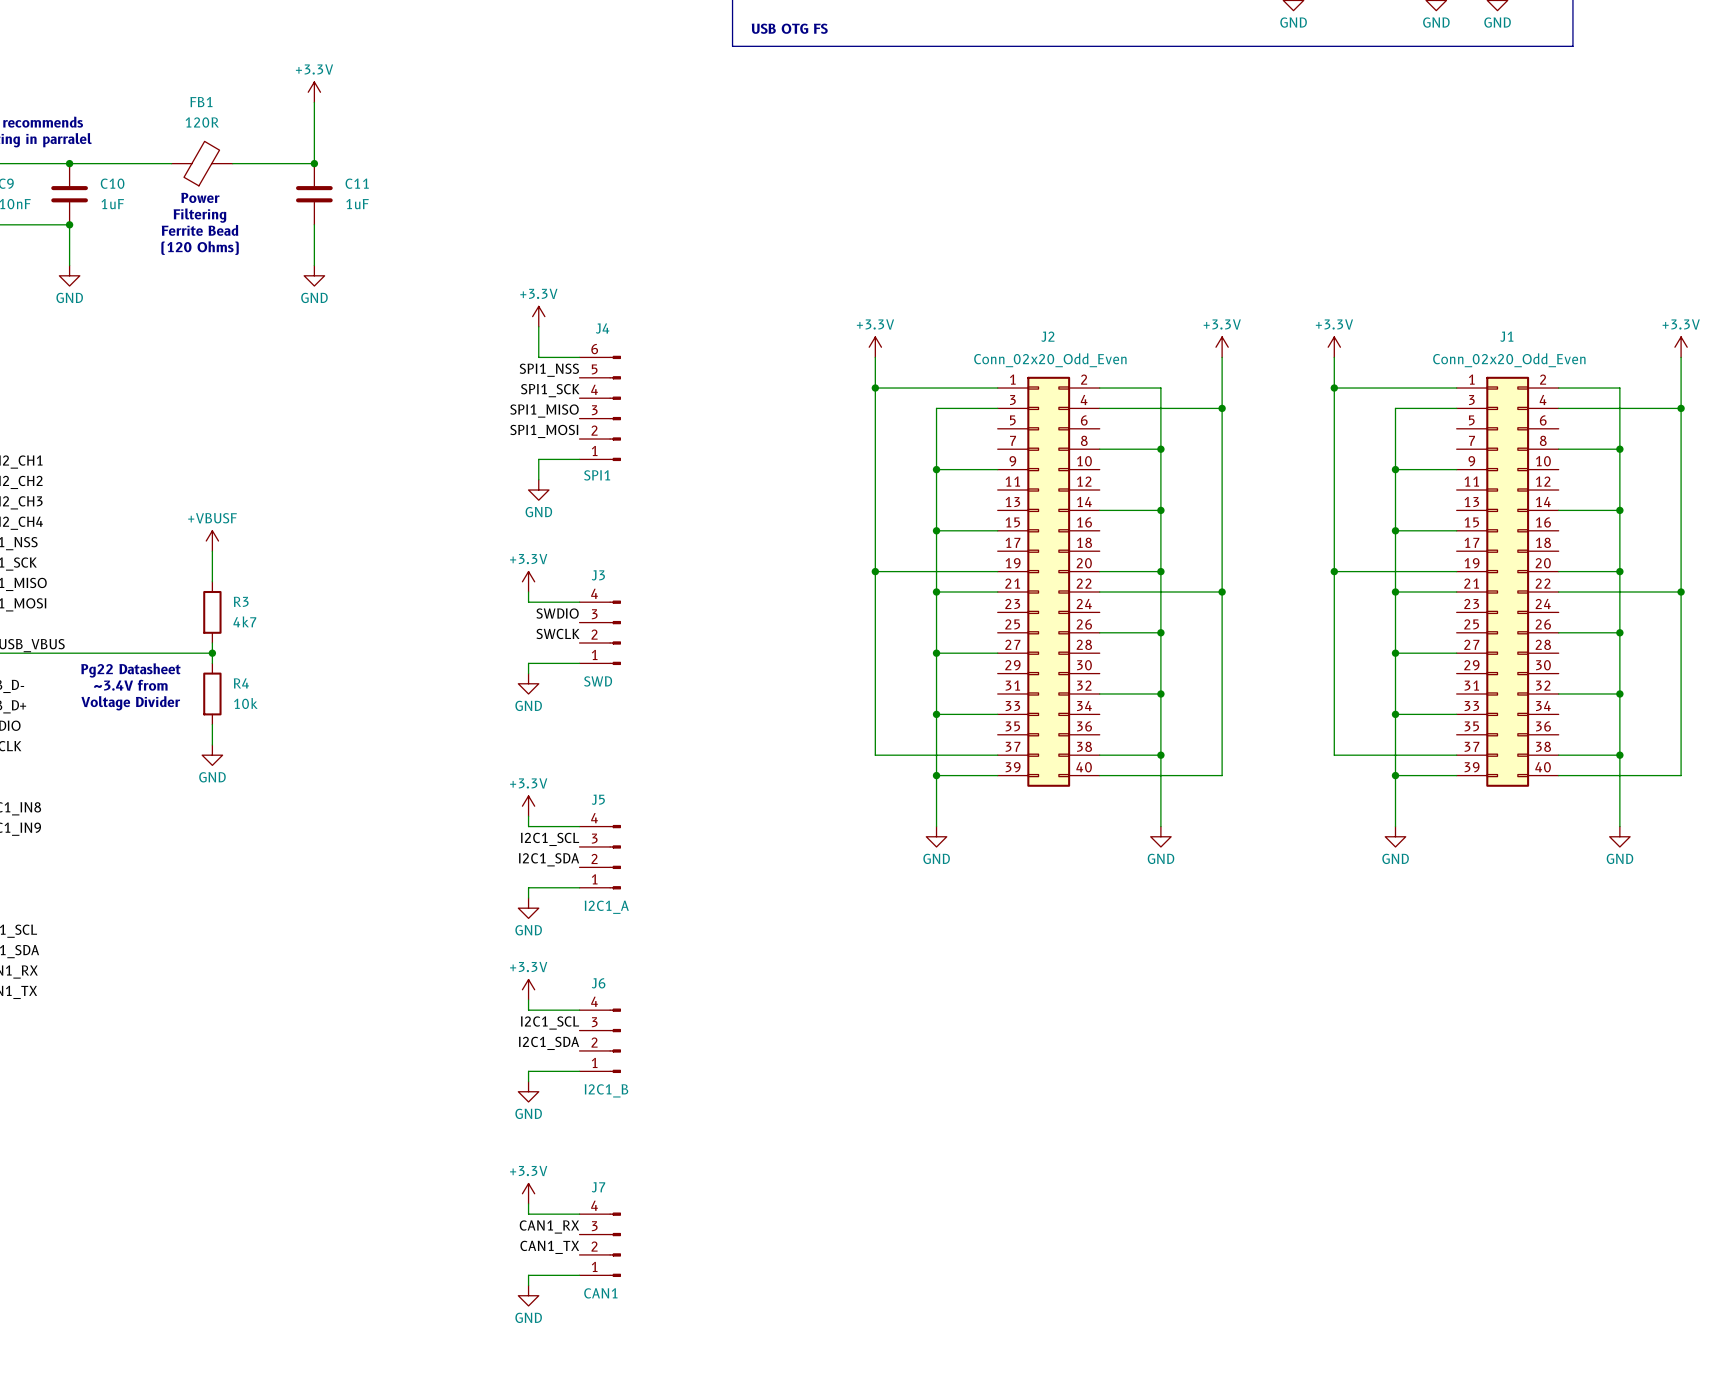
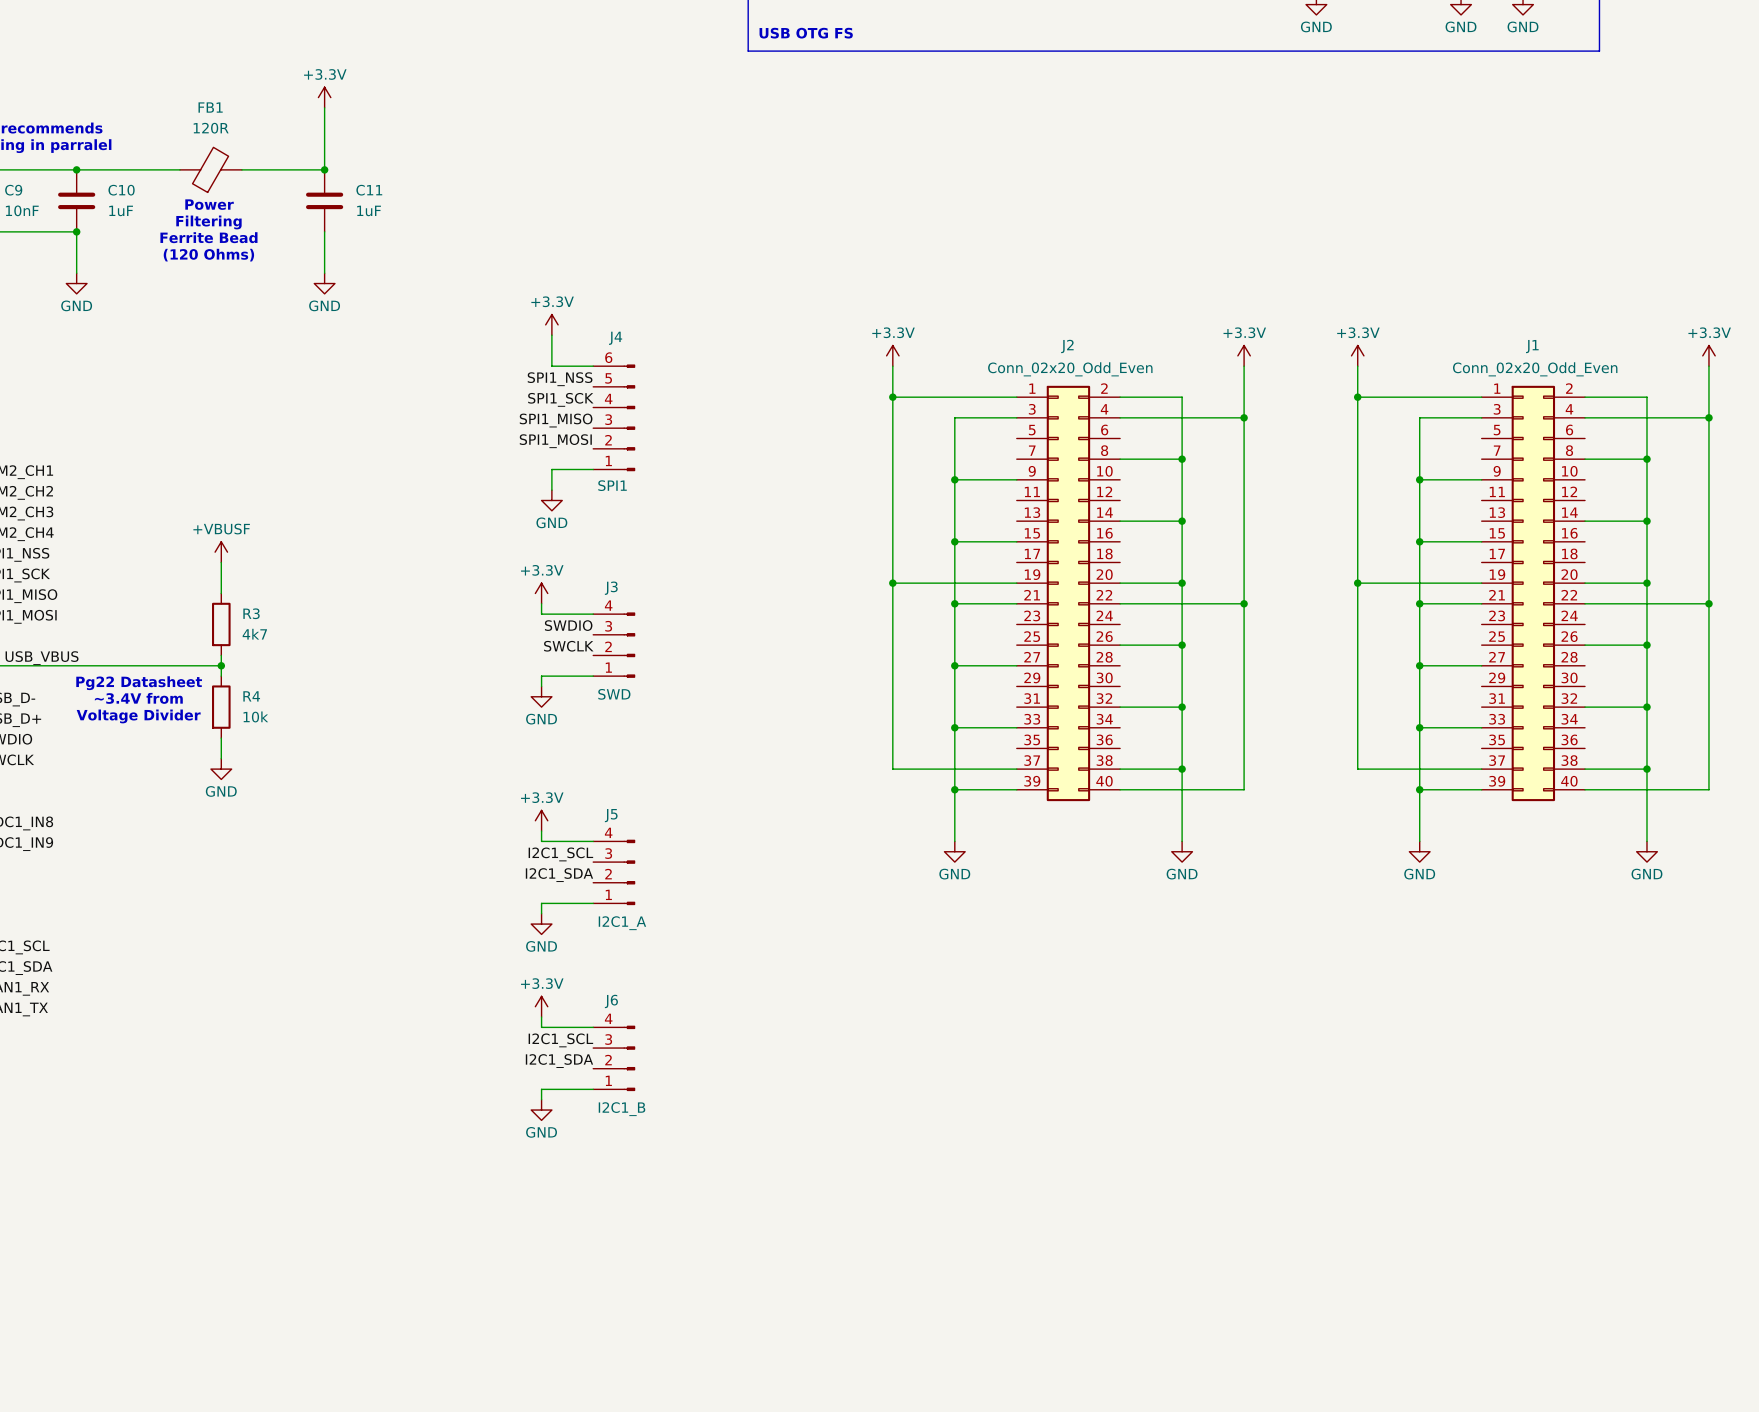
power symbol: +3.3V (528, 1193) -> none
wire: (528, 1203) (528, 1214) (579, 1214) -> none
label: CAN1_RX (549, 1226) -> none
J7: CAN1 (600, 1244) -> none
label: CAN1_TX (549, 1247) -> none
wire: (579, 1275) (528, 1275) (528, 1285) -> none
power symbol: GND (528, 1295) -> none

